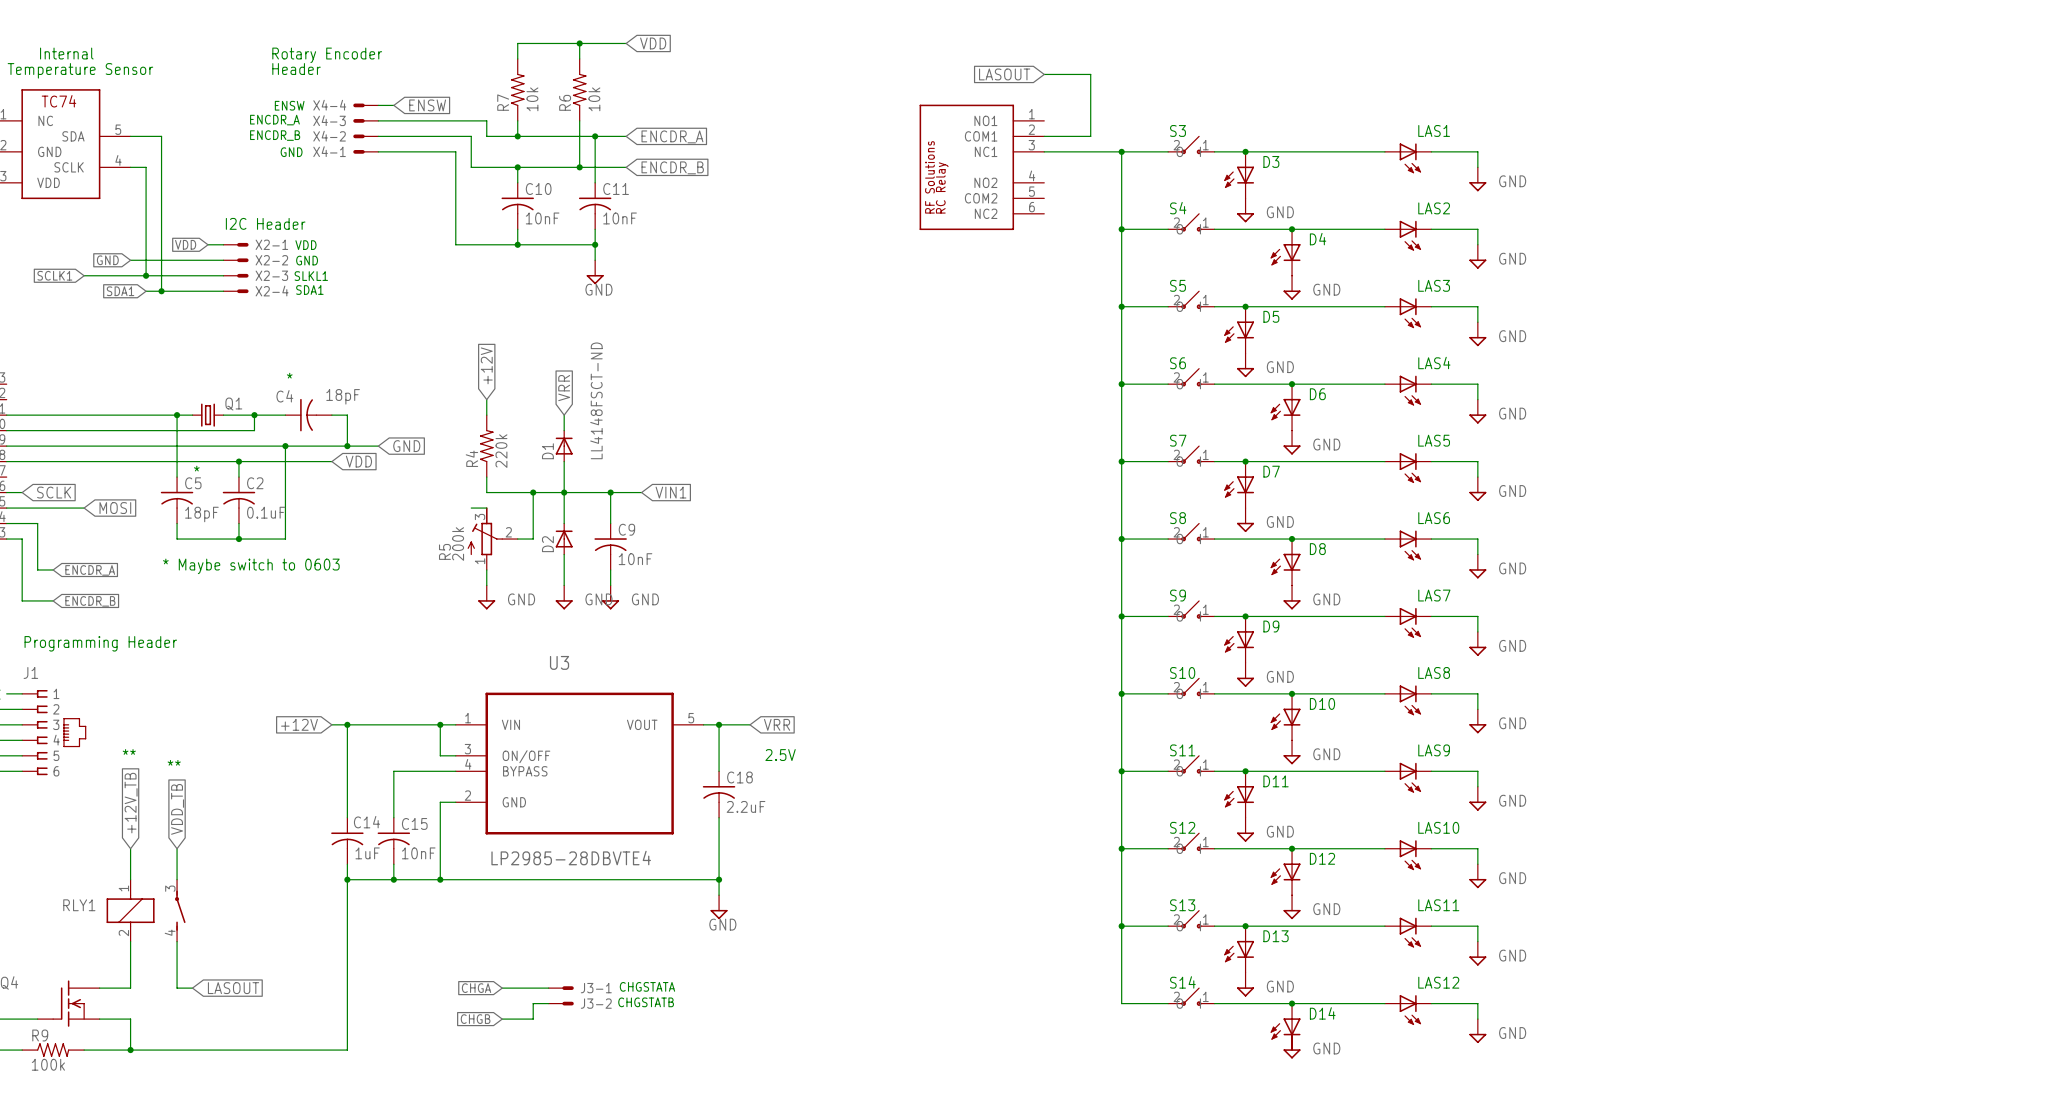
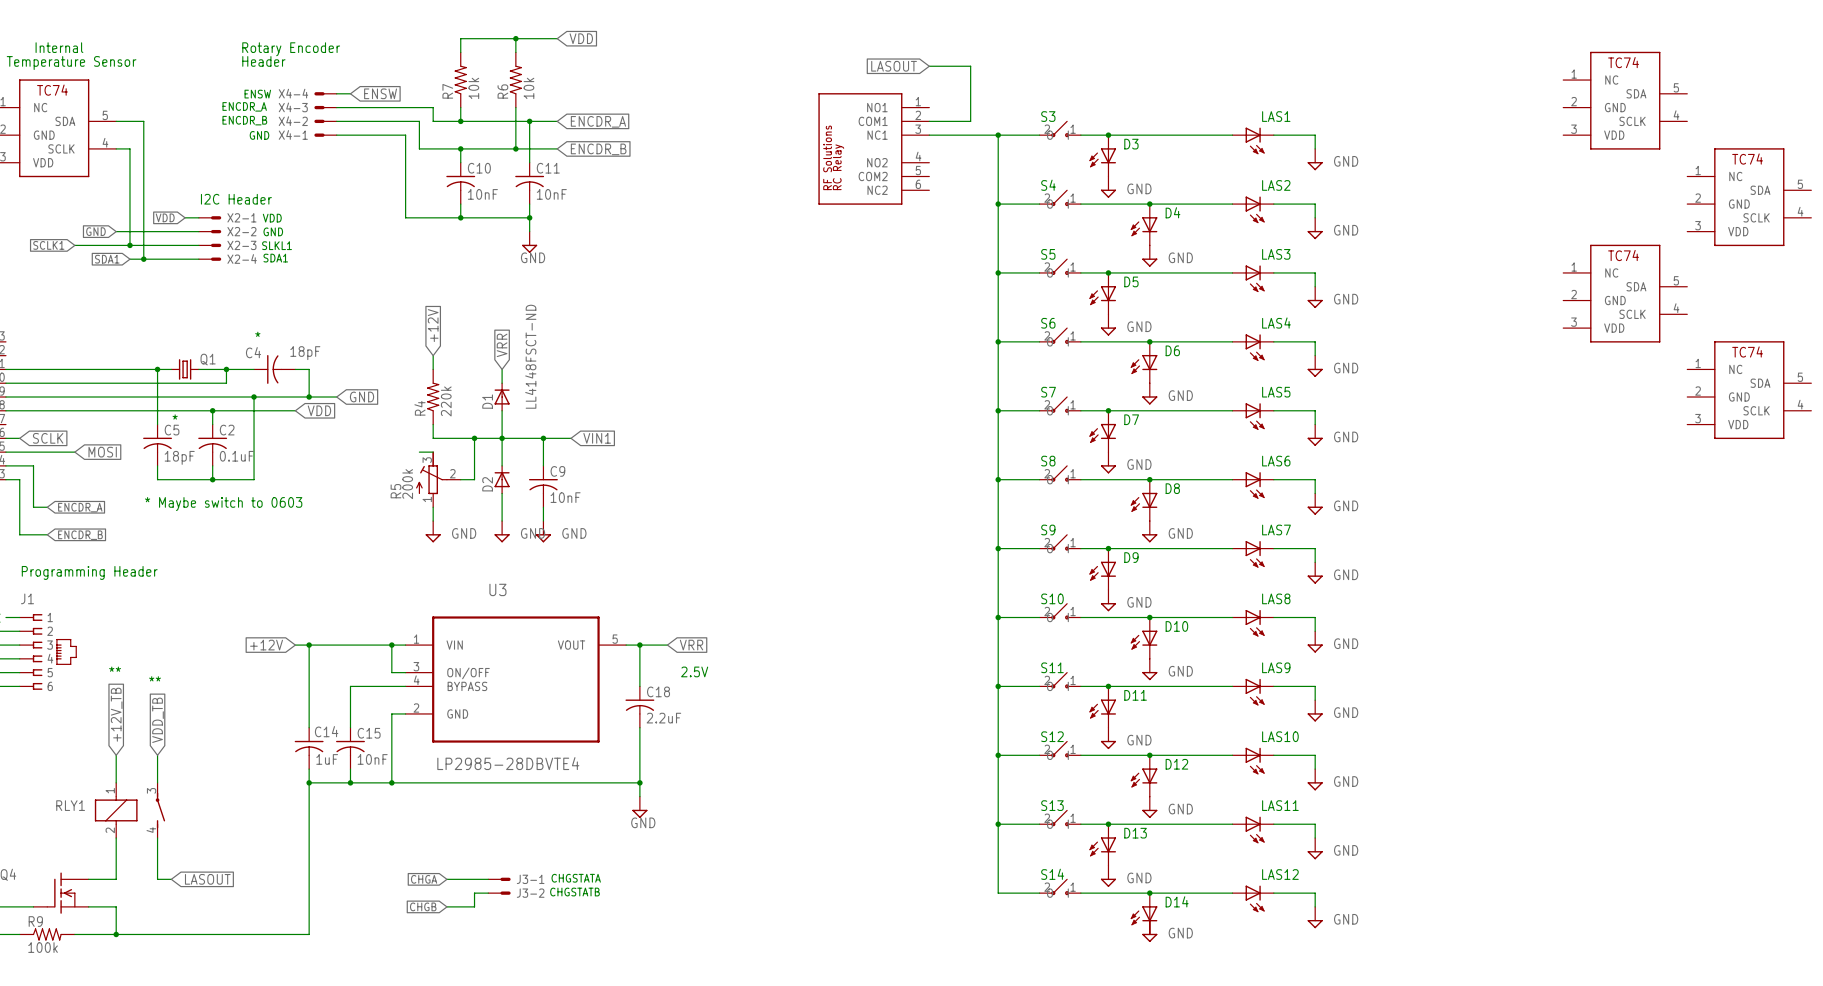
part: none -> (1625, 100)
part: none -> (1749, 197)
part: none -> (1625, 293)
part: none -> (1749, 390)

